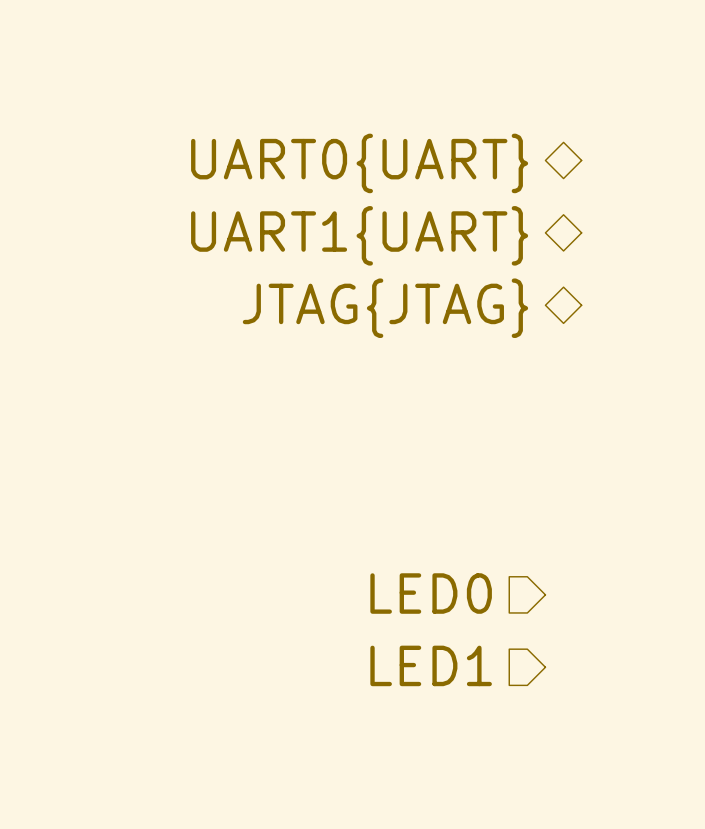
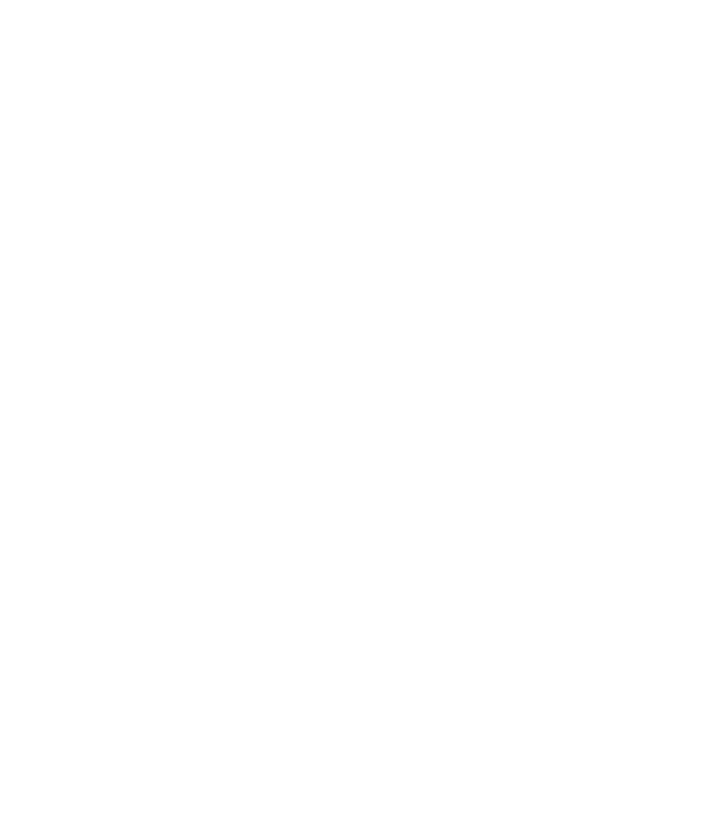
hierarchical label: UART0{UART} (359, 163) -> none
hierarchical label: UART1{UART} (359, 235) -> none
hierarchical label: JTAG{JTAG} (385, 308) -> none
hierarchical label: LED0 (431, 593) -> none
hierarchical label: LED1 (431, 665) -> none

